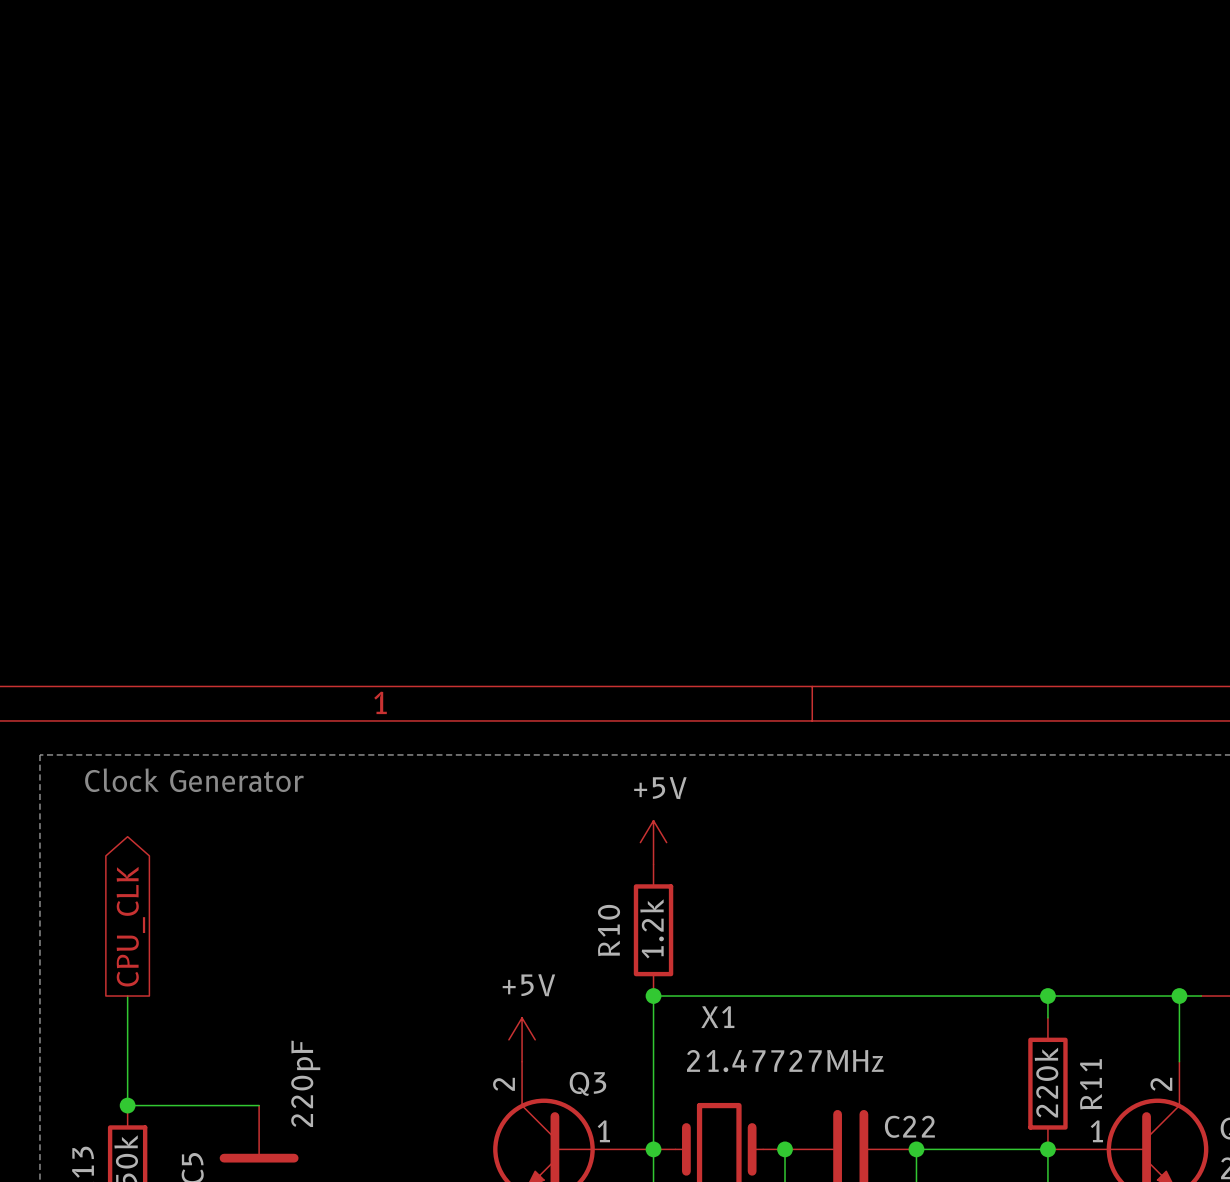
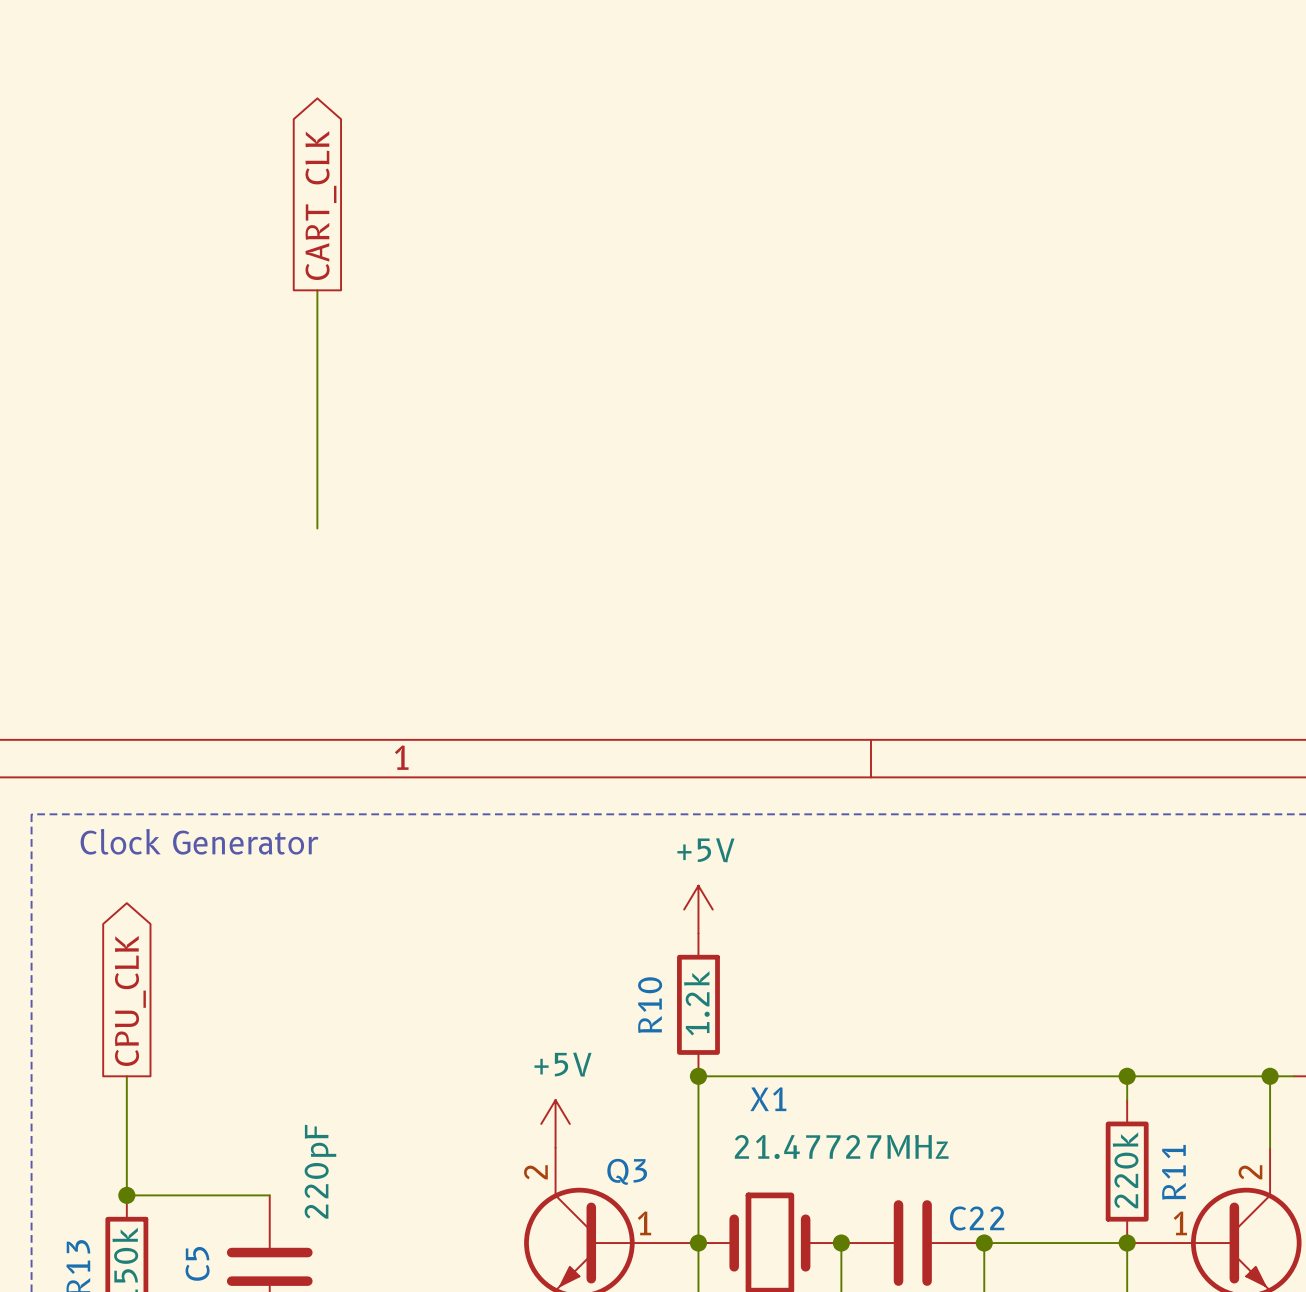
global label: none -> CART_CLK (320, 205)
wire: none -> (317, 290) (317, 528)

